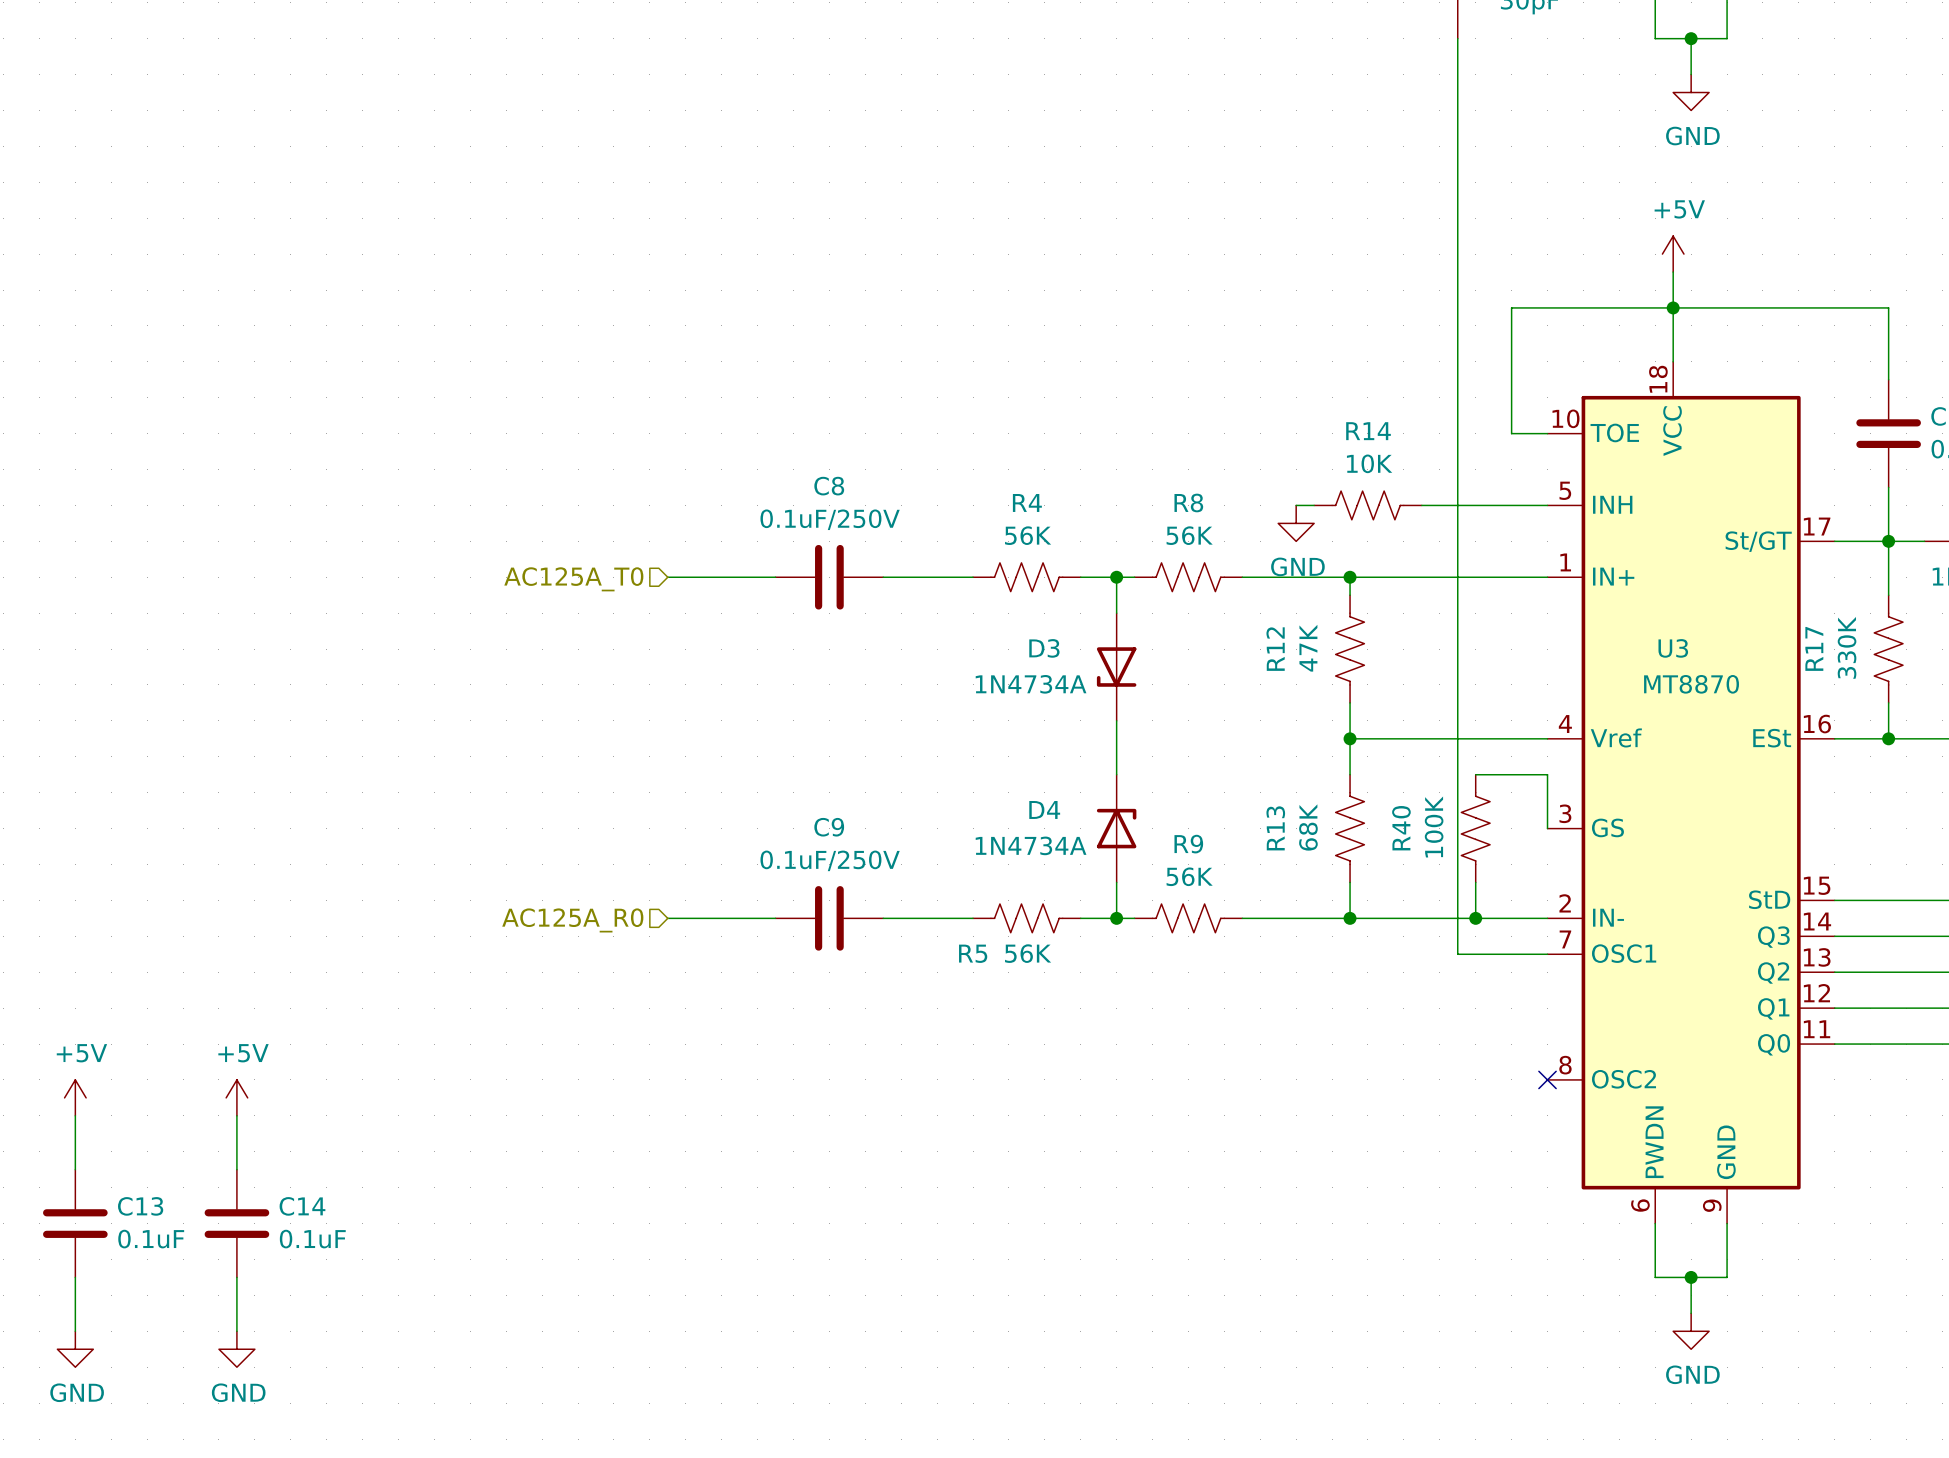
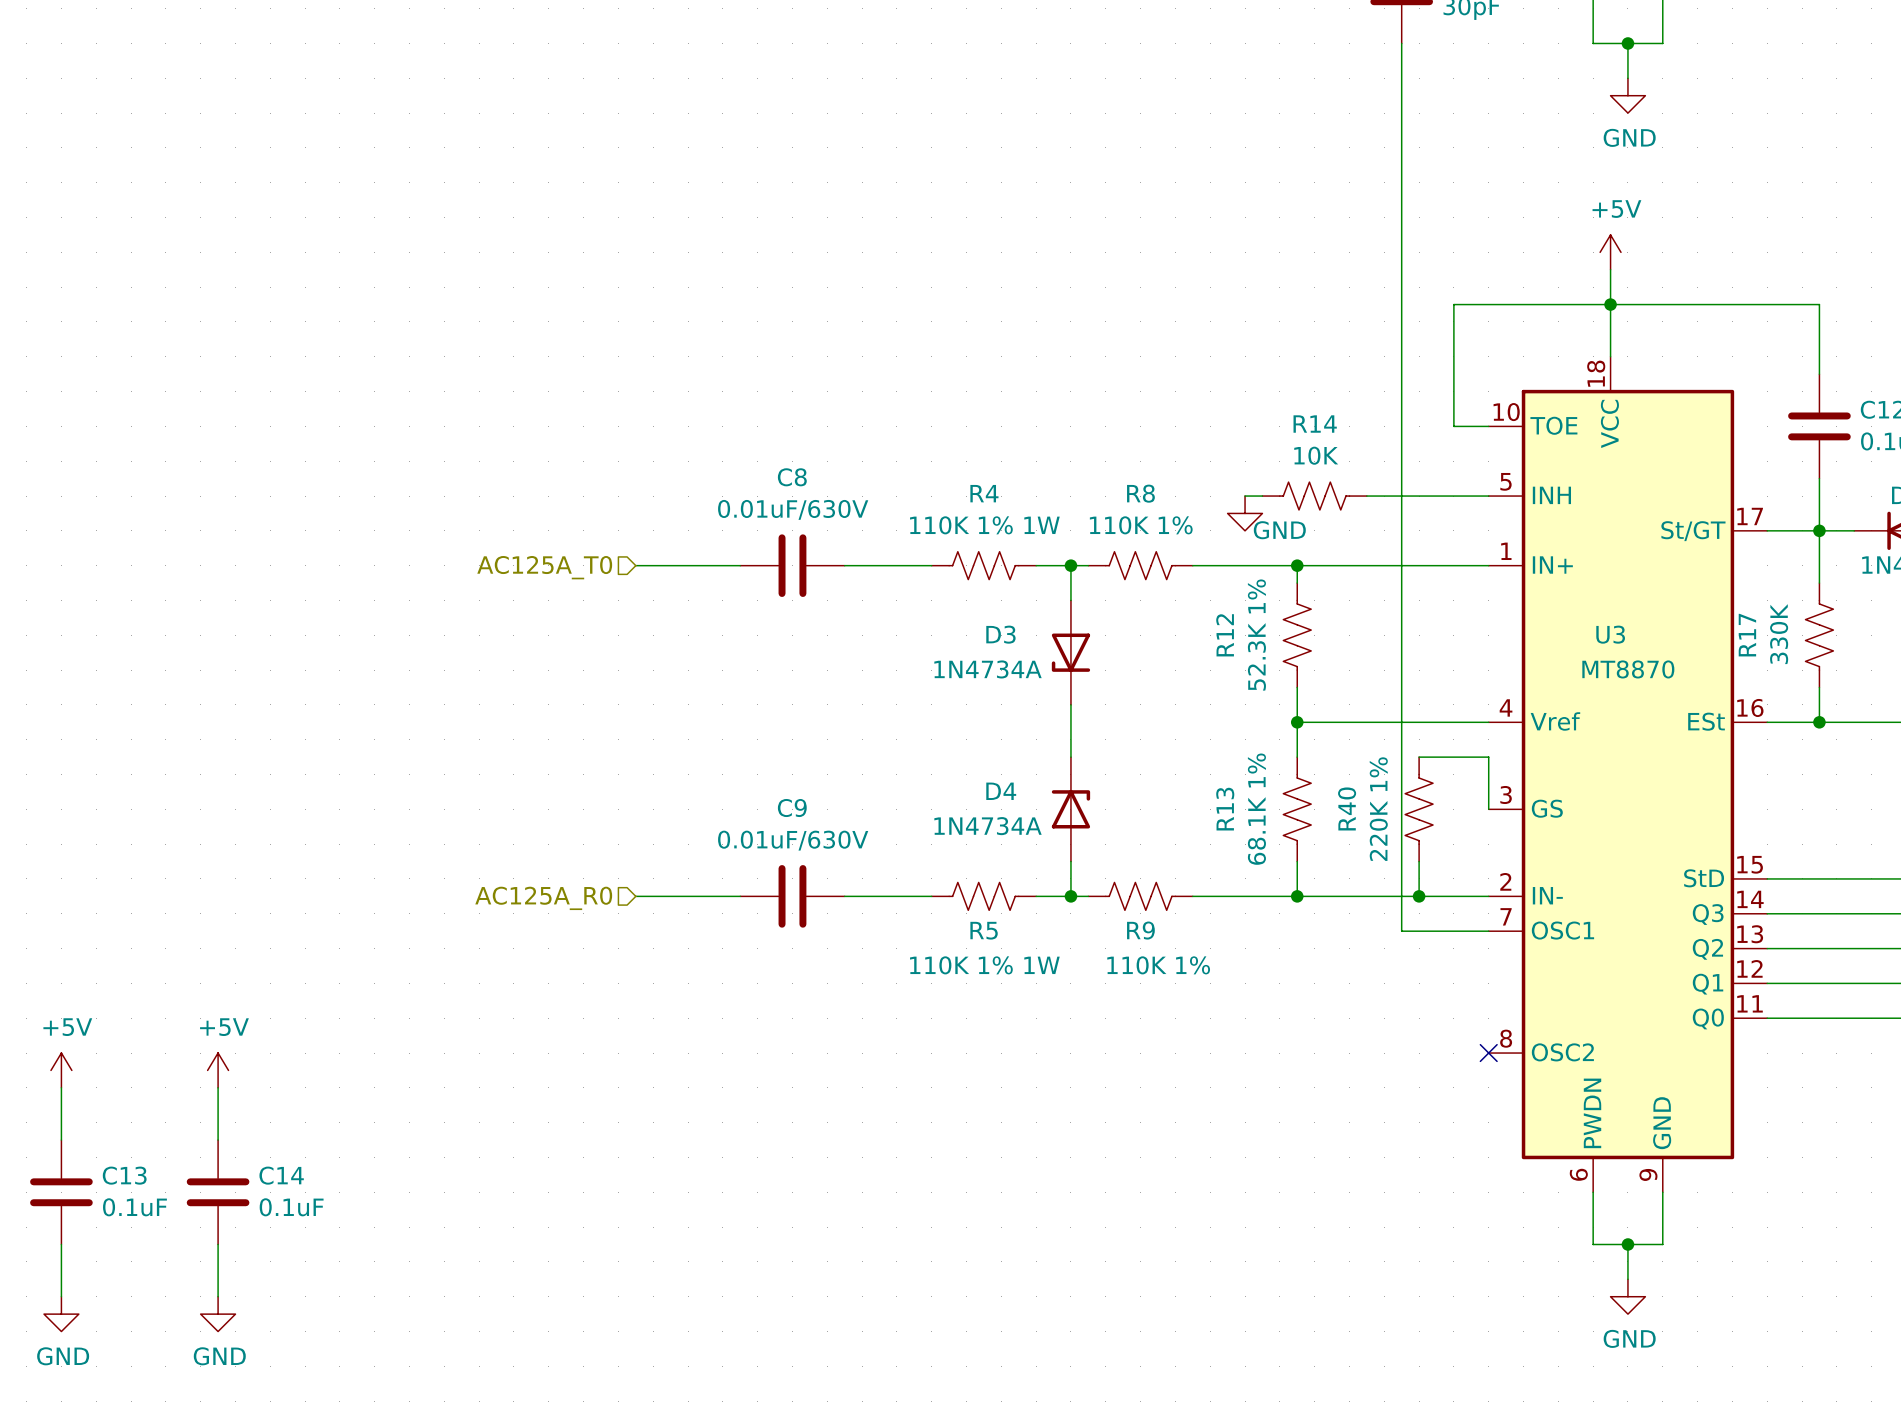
C8 value: 0.1uF/250V (830, 519) -> 0.01uF/630V (793, 509)
R4 value: 56K (1028, 535) -> 110K 1% 1W (984, 525)
R8 value: 56K (1189, 535) -> 110K 1% (1141, 525)
power symbol text position: GND (1297, 566) -> GND (1279, 530)
R12 value: 47K (1308, 648) -> 52.3K 1% (1256, 635)
R40 value: 100K (1434, 826) -> 220K 1% (1378, 809)
R13 value: 68K (1308, 827) -> 68.1K 1% (1256, 809)
R9 name position: R9 (1188, 844) -> R9 (1140, 930)
C9 value: 0.1uF/250V (830, 860) -> 0.01uF/630V (793, 840)
R9 value: 56K (1189, 876) -> 110K 1% (1158, 965)
R5 name position: R5 (973, 953) -> R5 (984, 930)
R5 value: 56K (1028, 953) -> 110K 1% 1W (984, 965)

